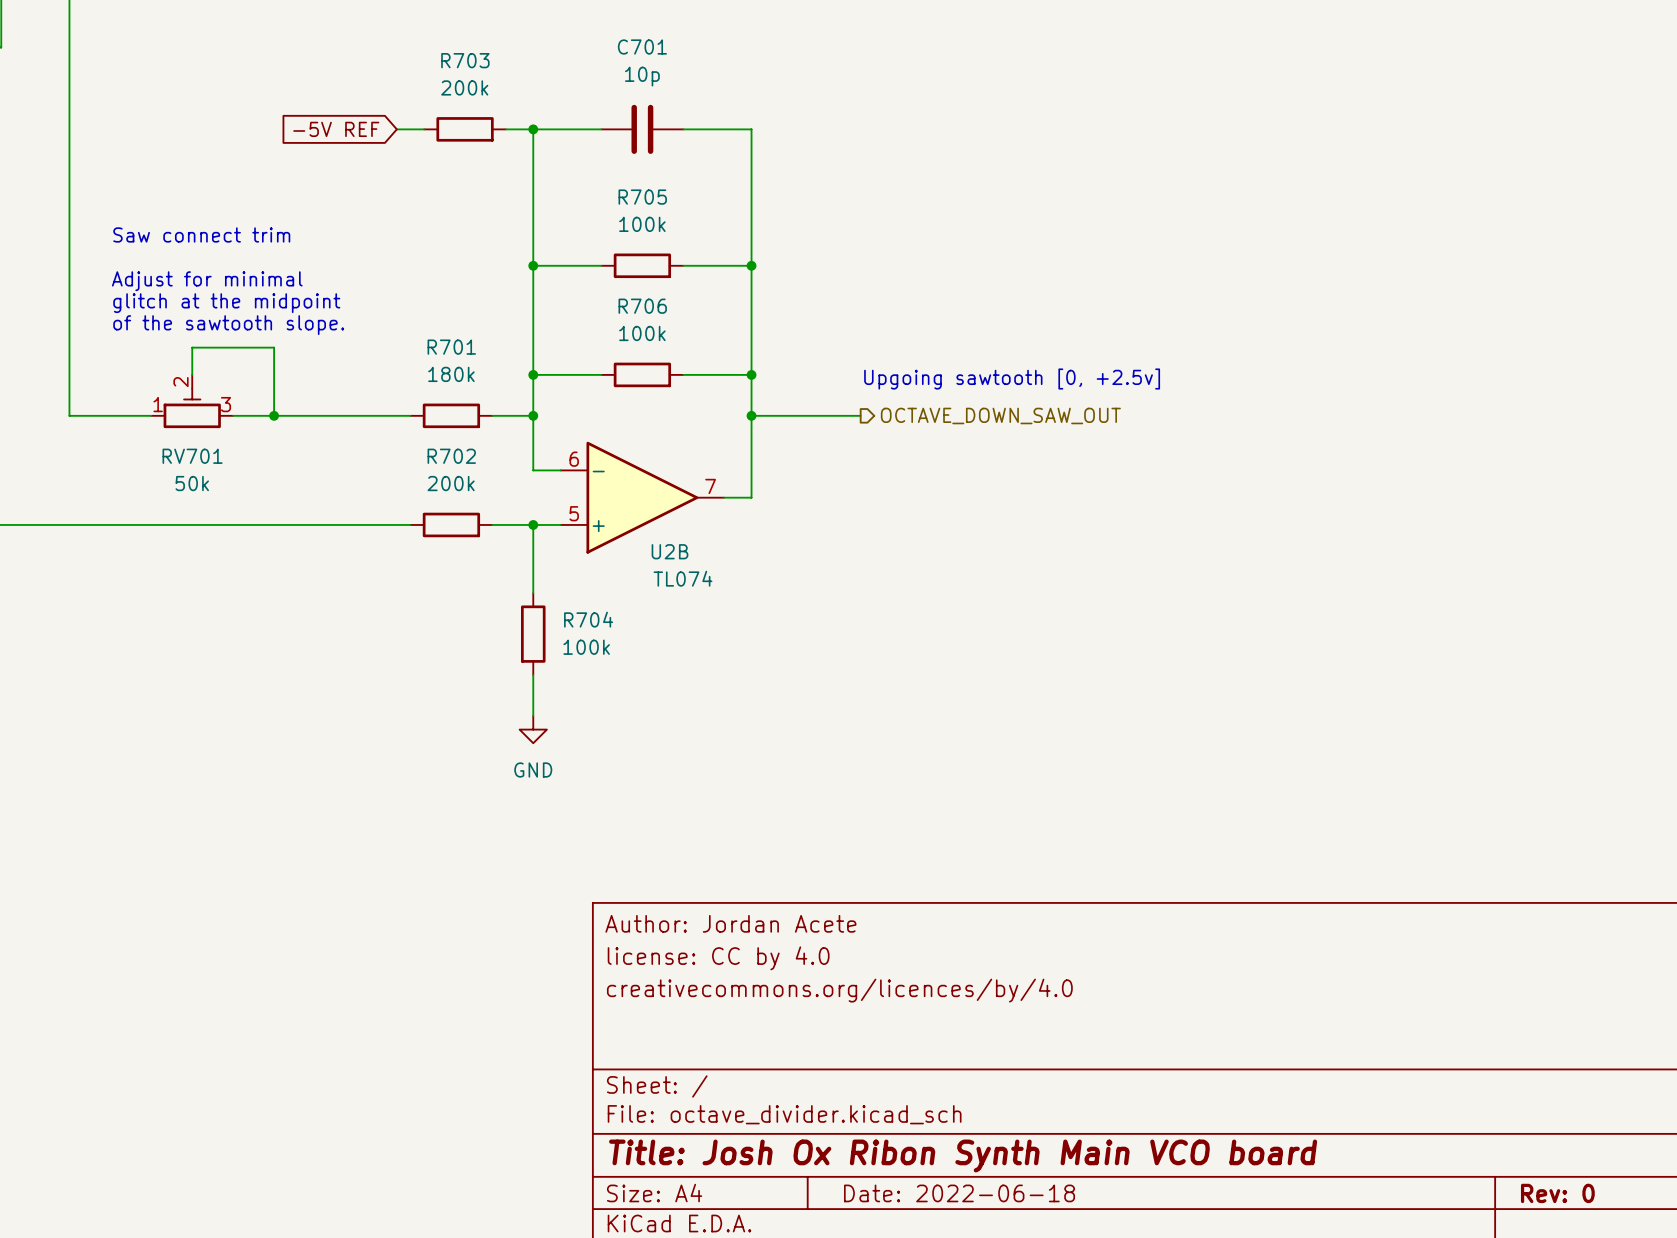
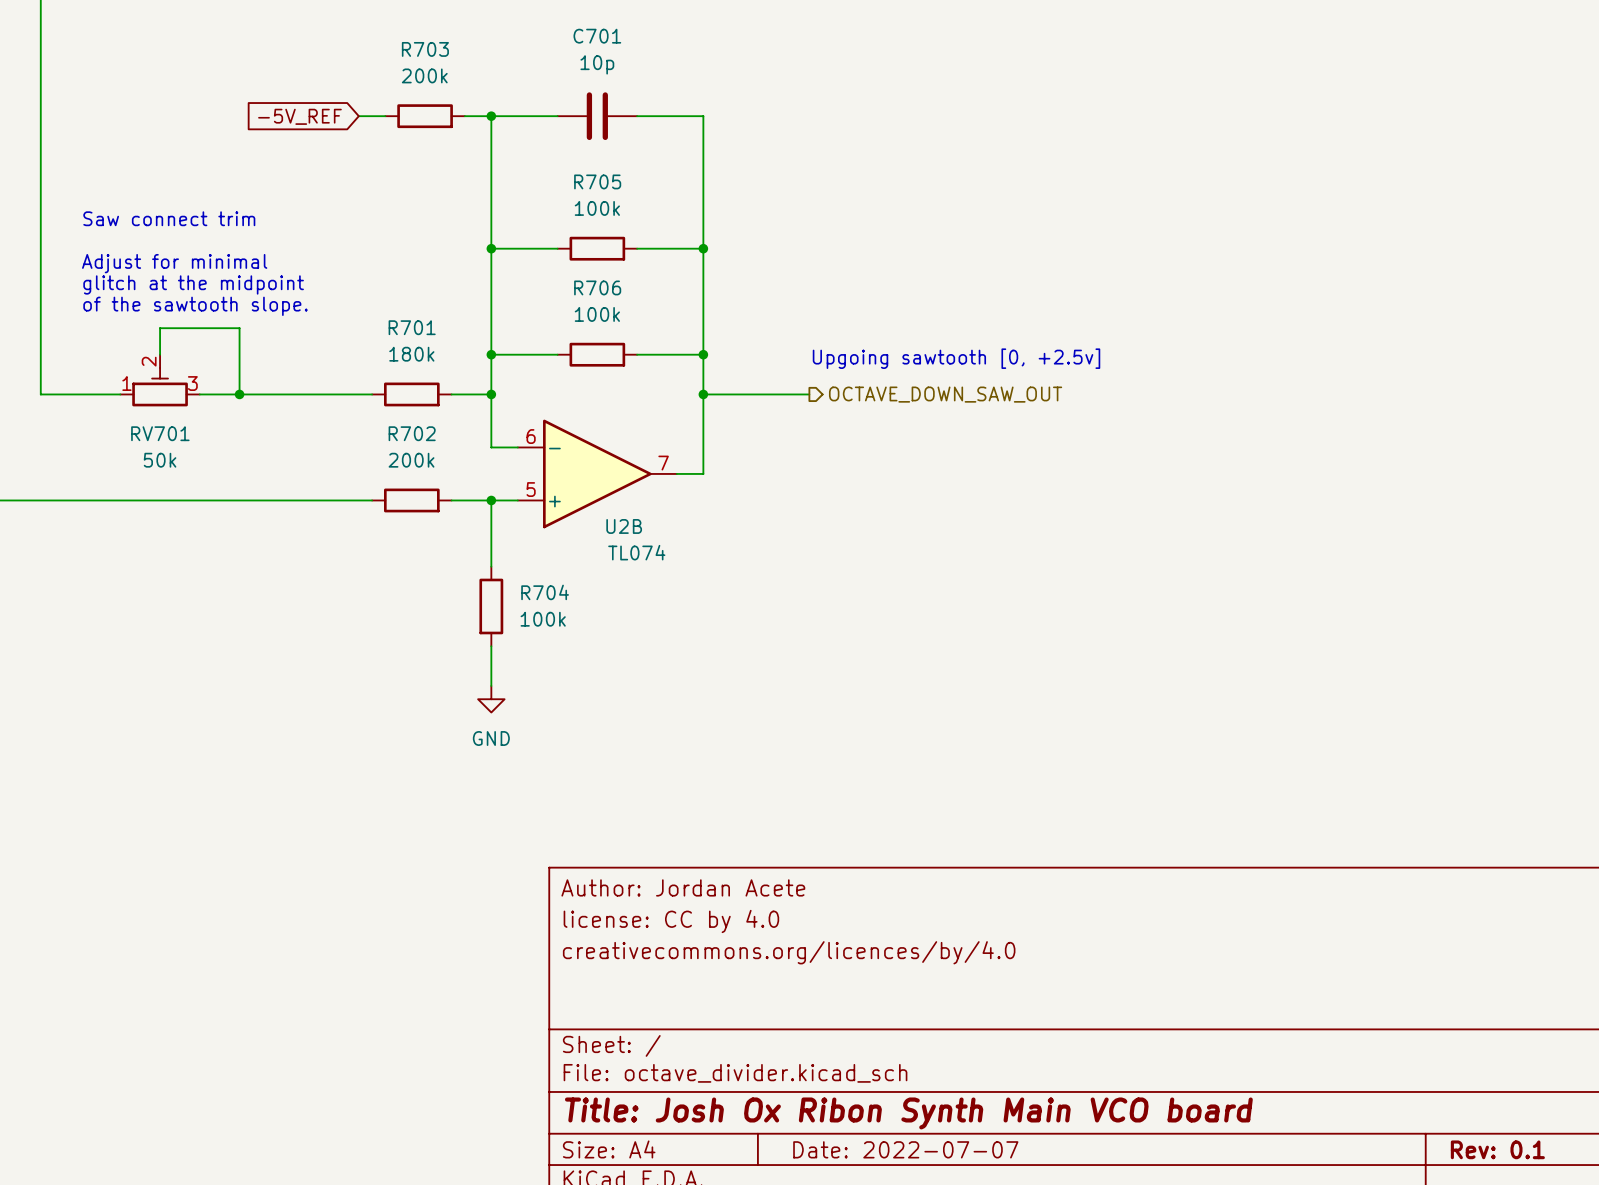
global label: -5V REF (336, 129) -> -5V_REF (299, 116)
title block: Date: 2022-06-18 (959, 1193) -> Date: 2022-07-07 (905, 1149)
title block: Rev: 0 (1557, 1193) -> Rev: 0.1 (1497, 1149)

